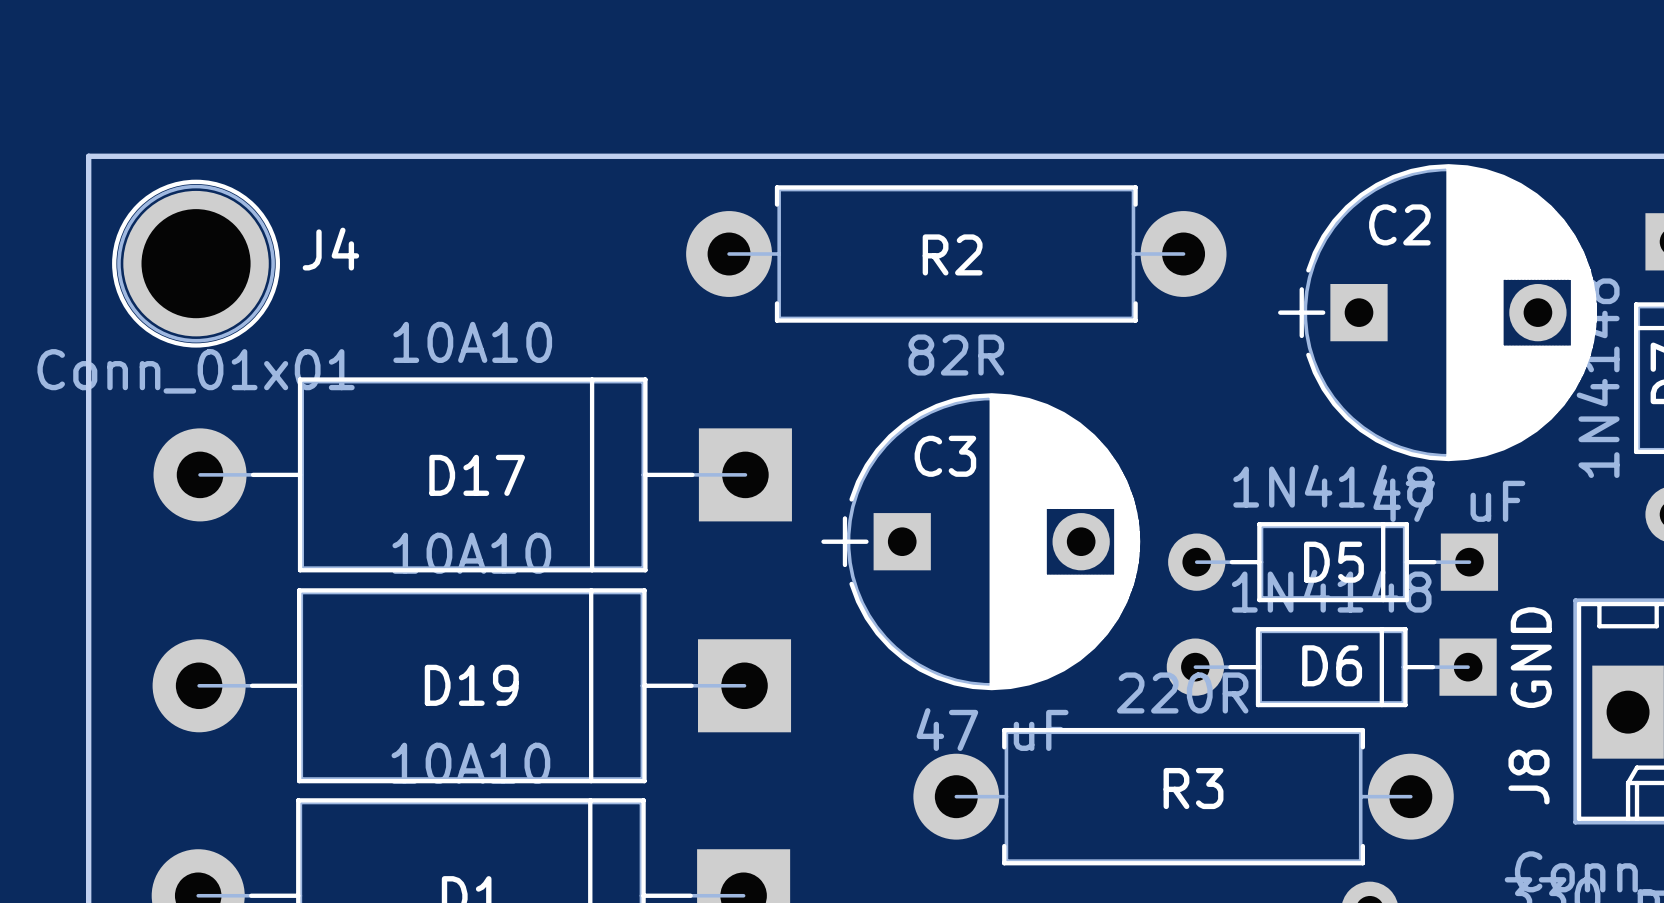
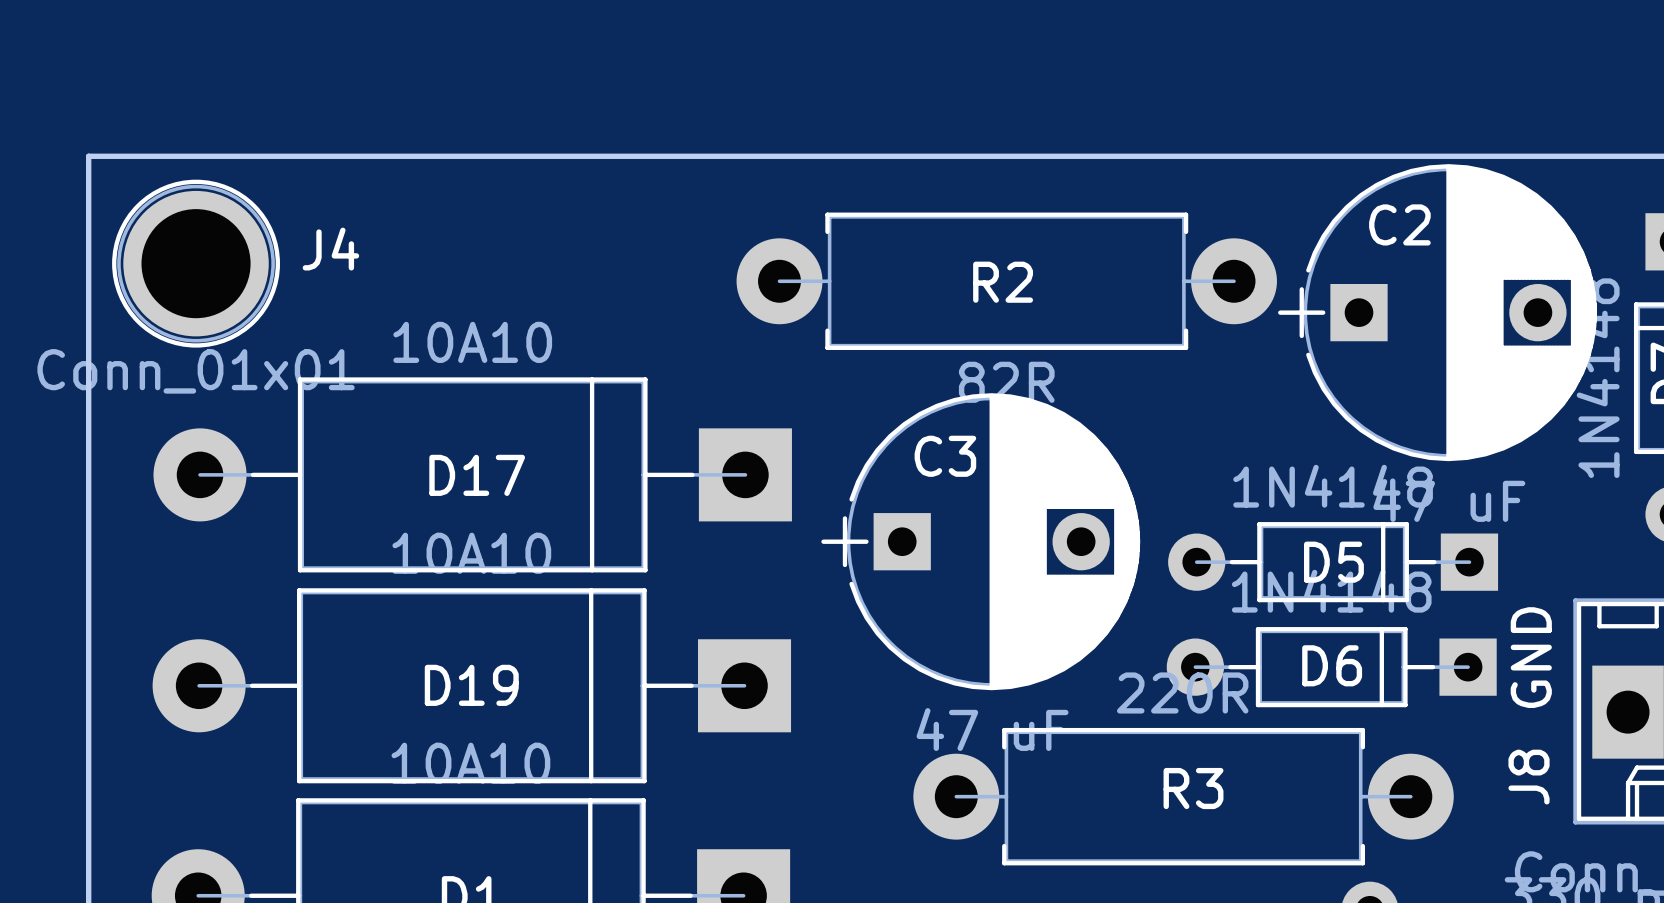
R2 position: (956, 254) -> (1006, 281)

